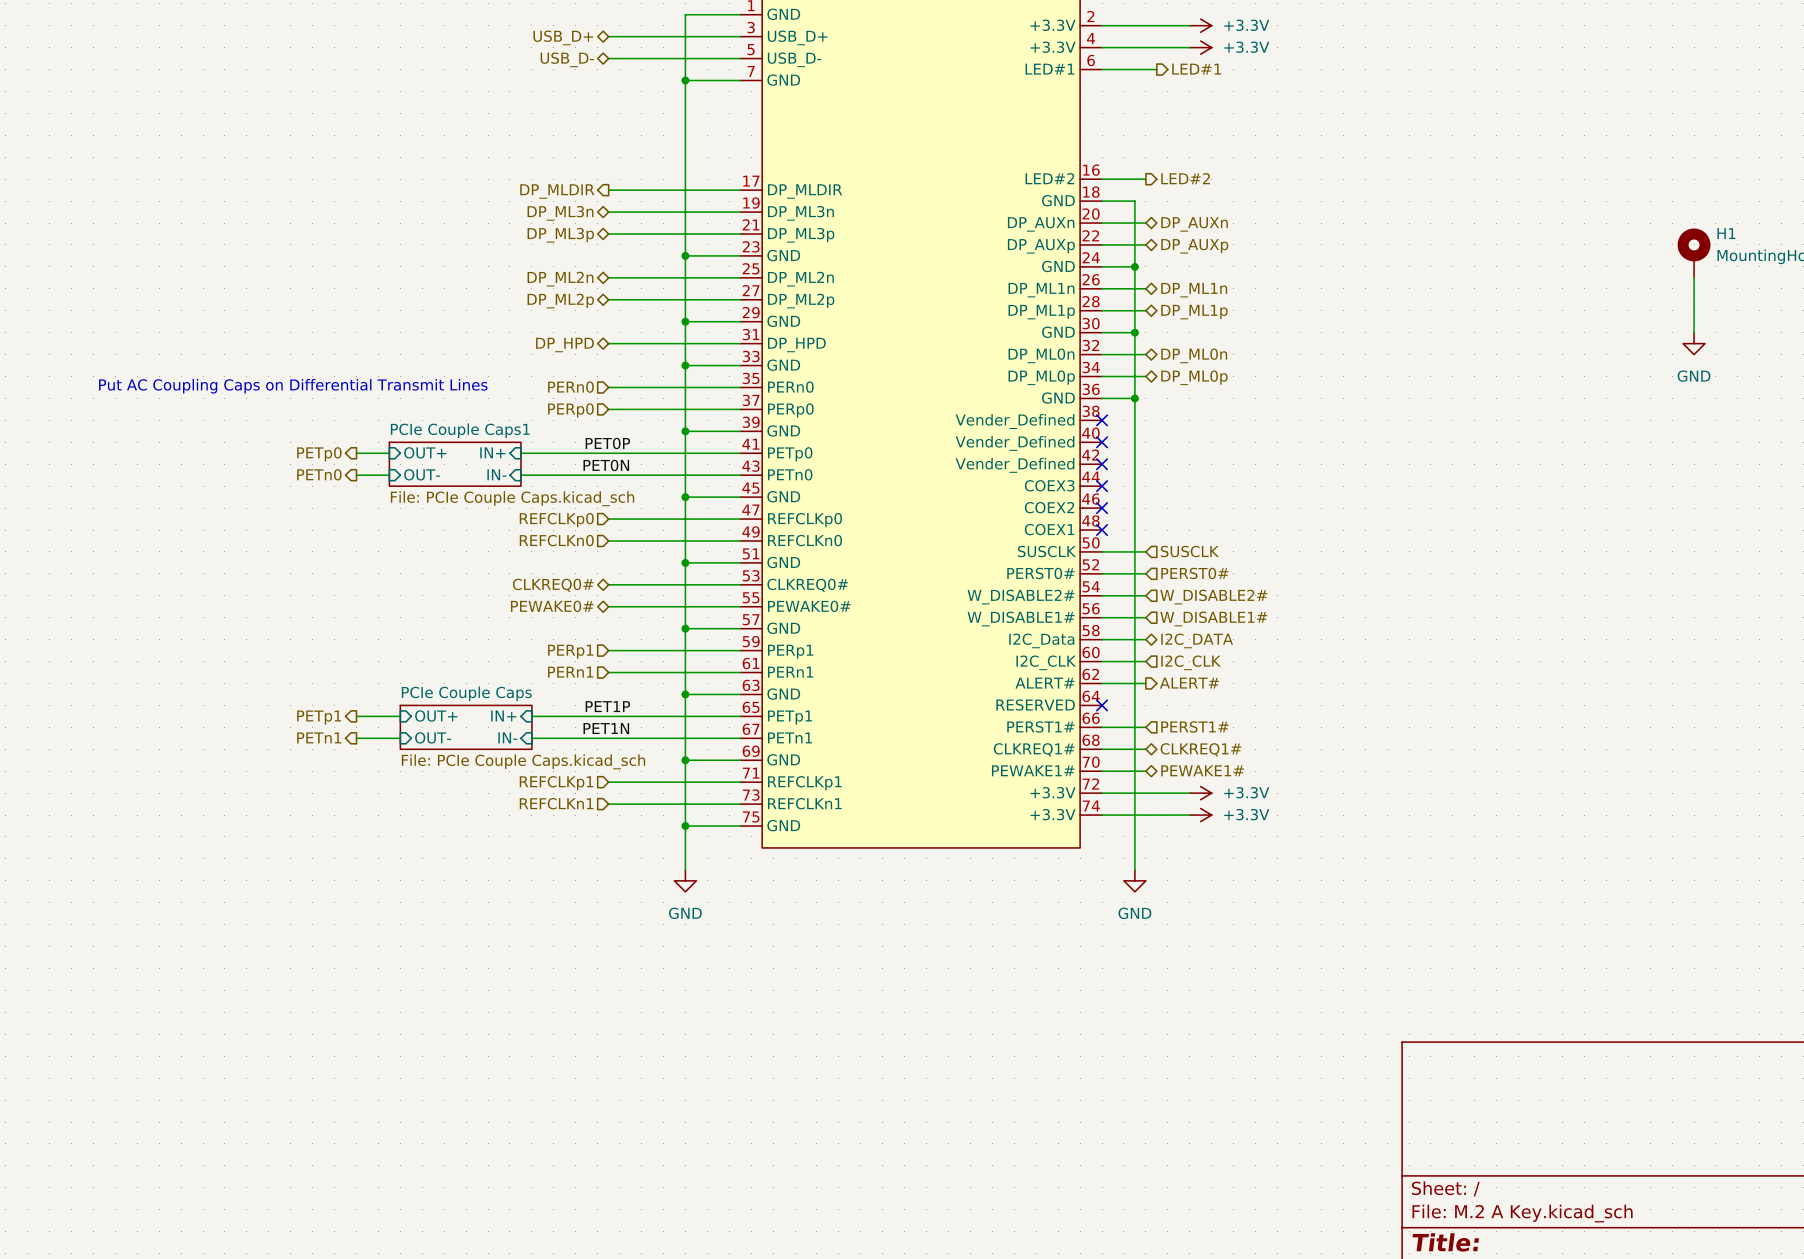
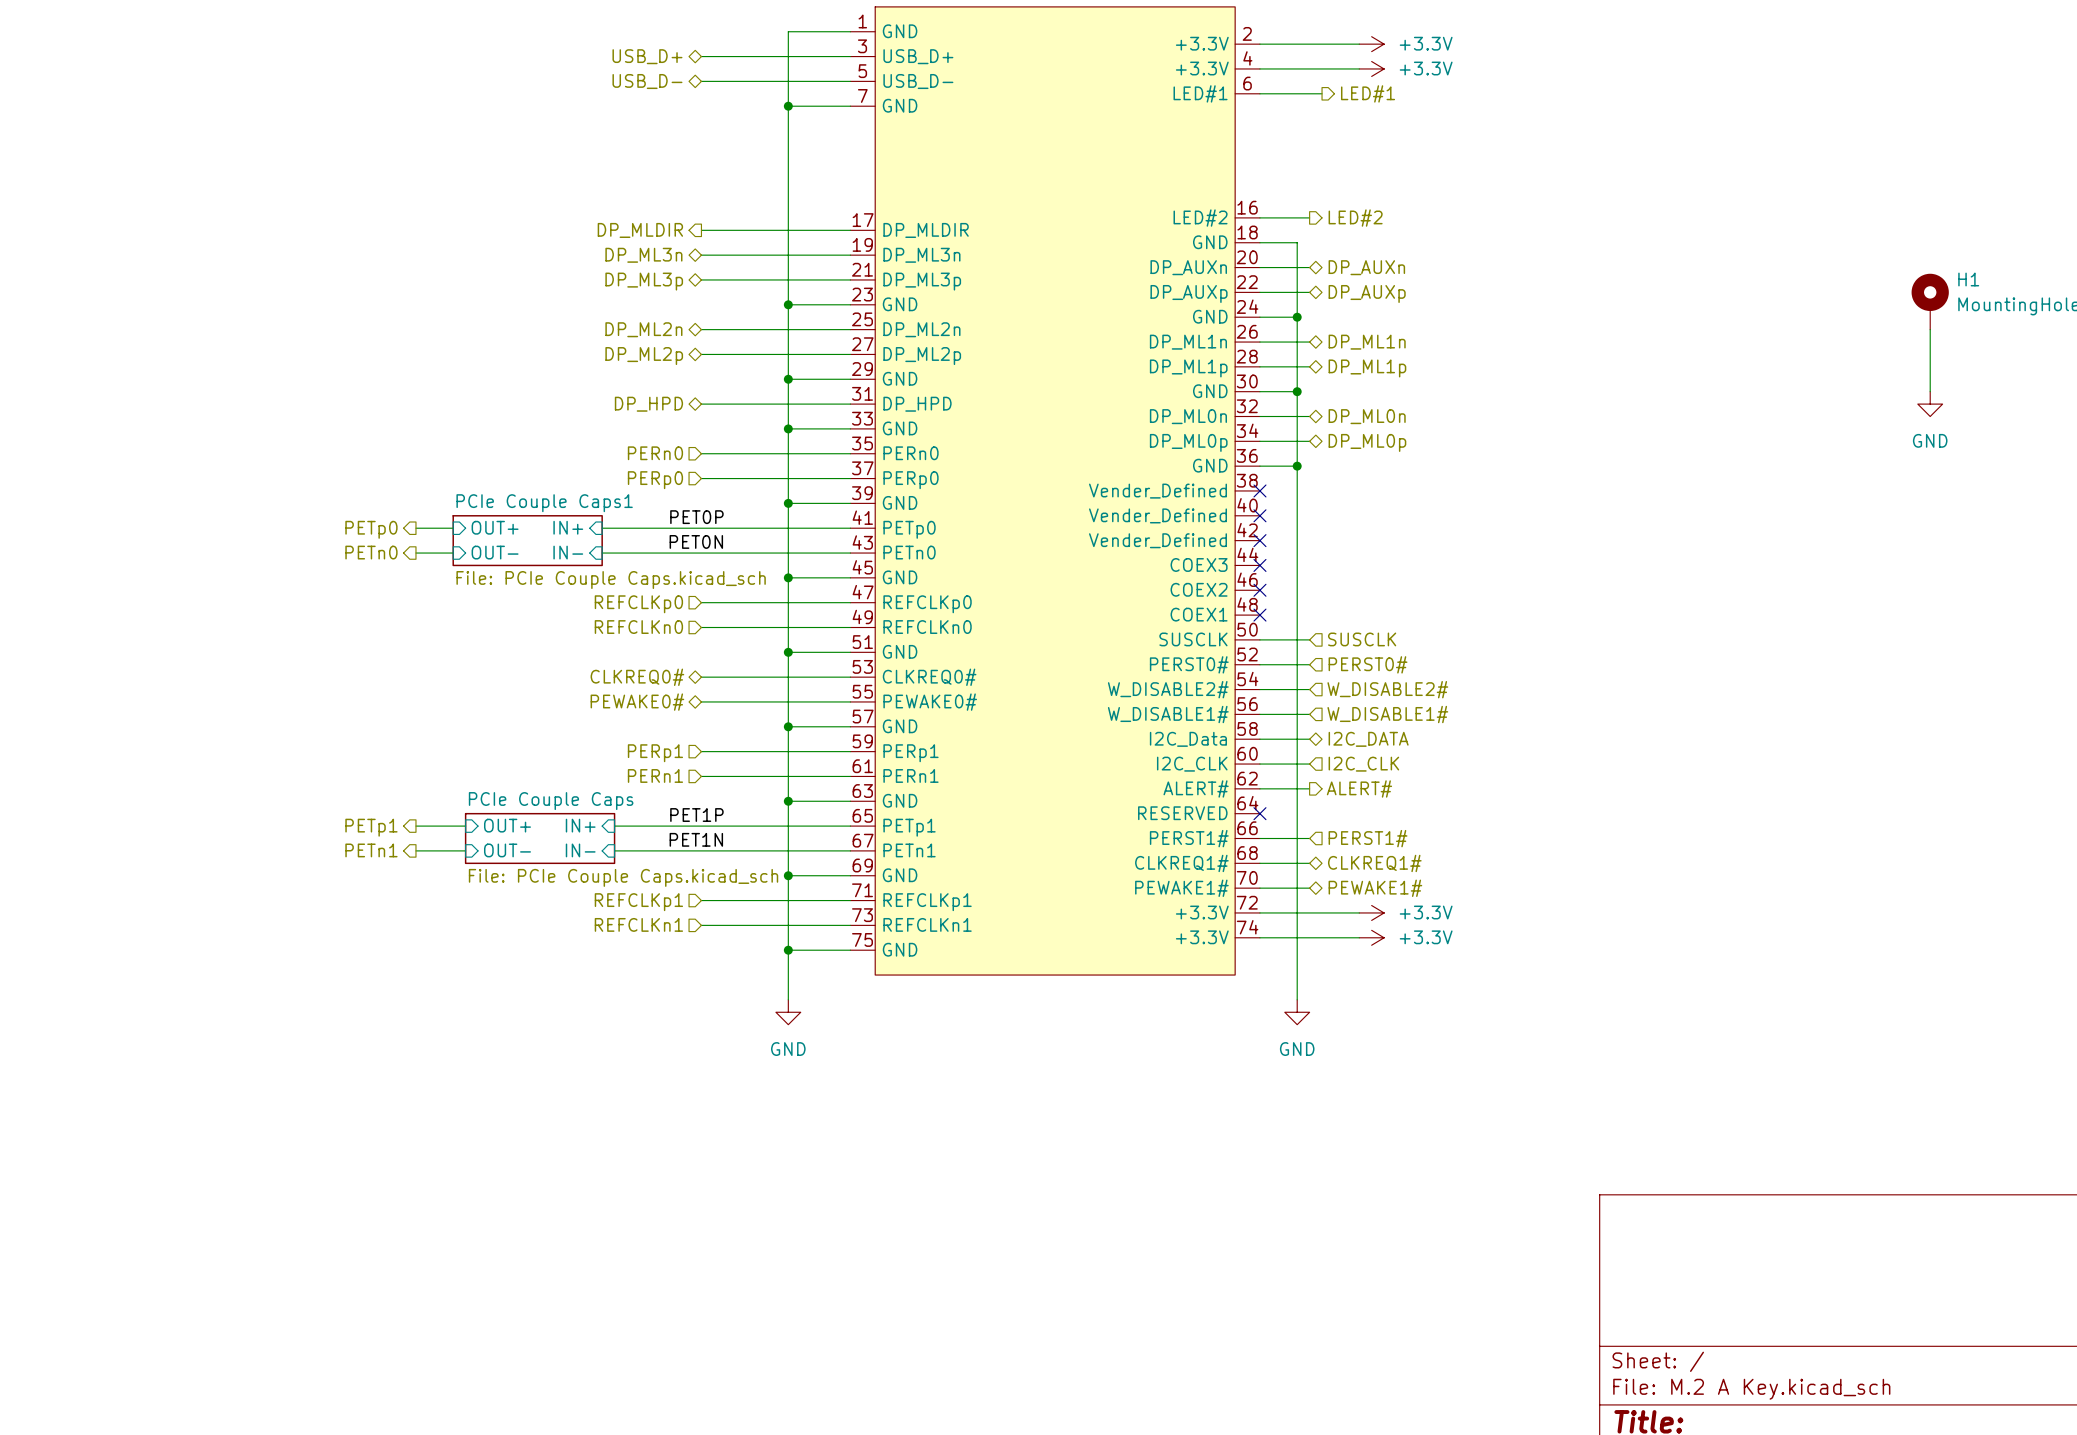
text: Put AC Coupling Caps on Differential Transmit Lines (293, 386) -> none

